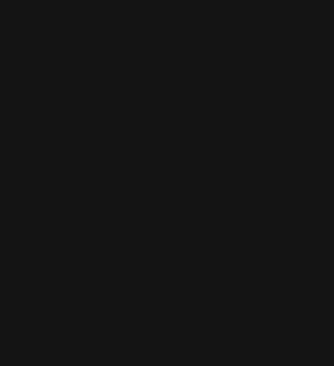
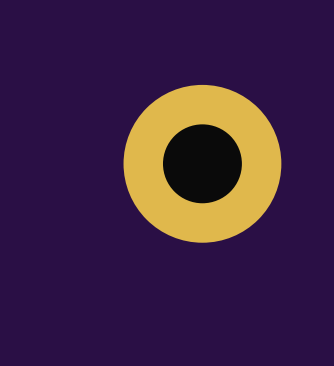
part: none -> (202, 163)

